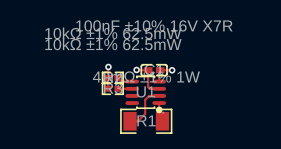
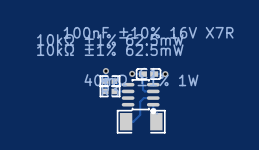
U1 name: U1 (145, 91) -> none
R1 name: R1 (146, 120) -> none

